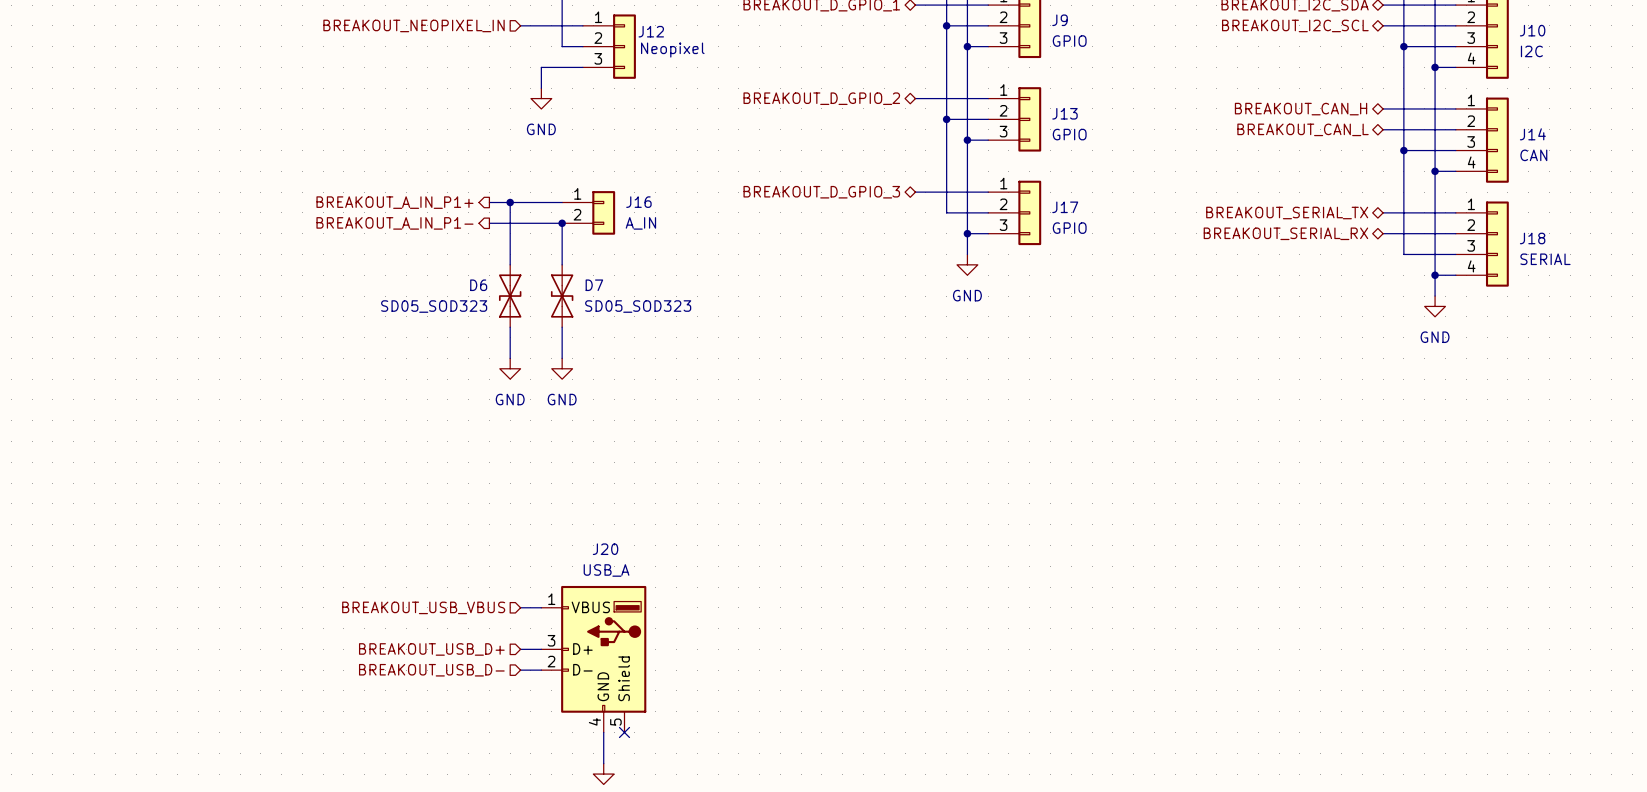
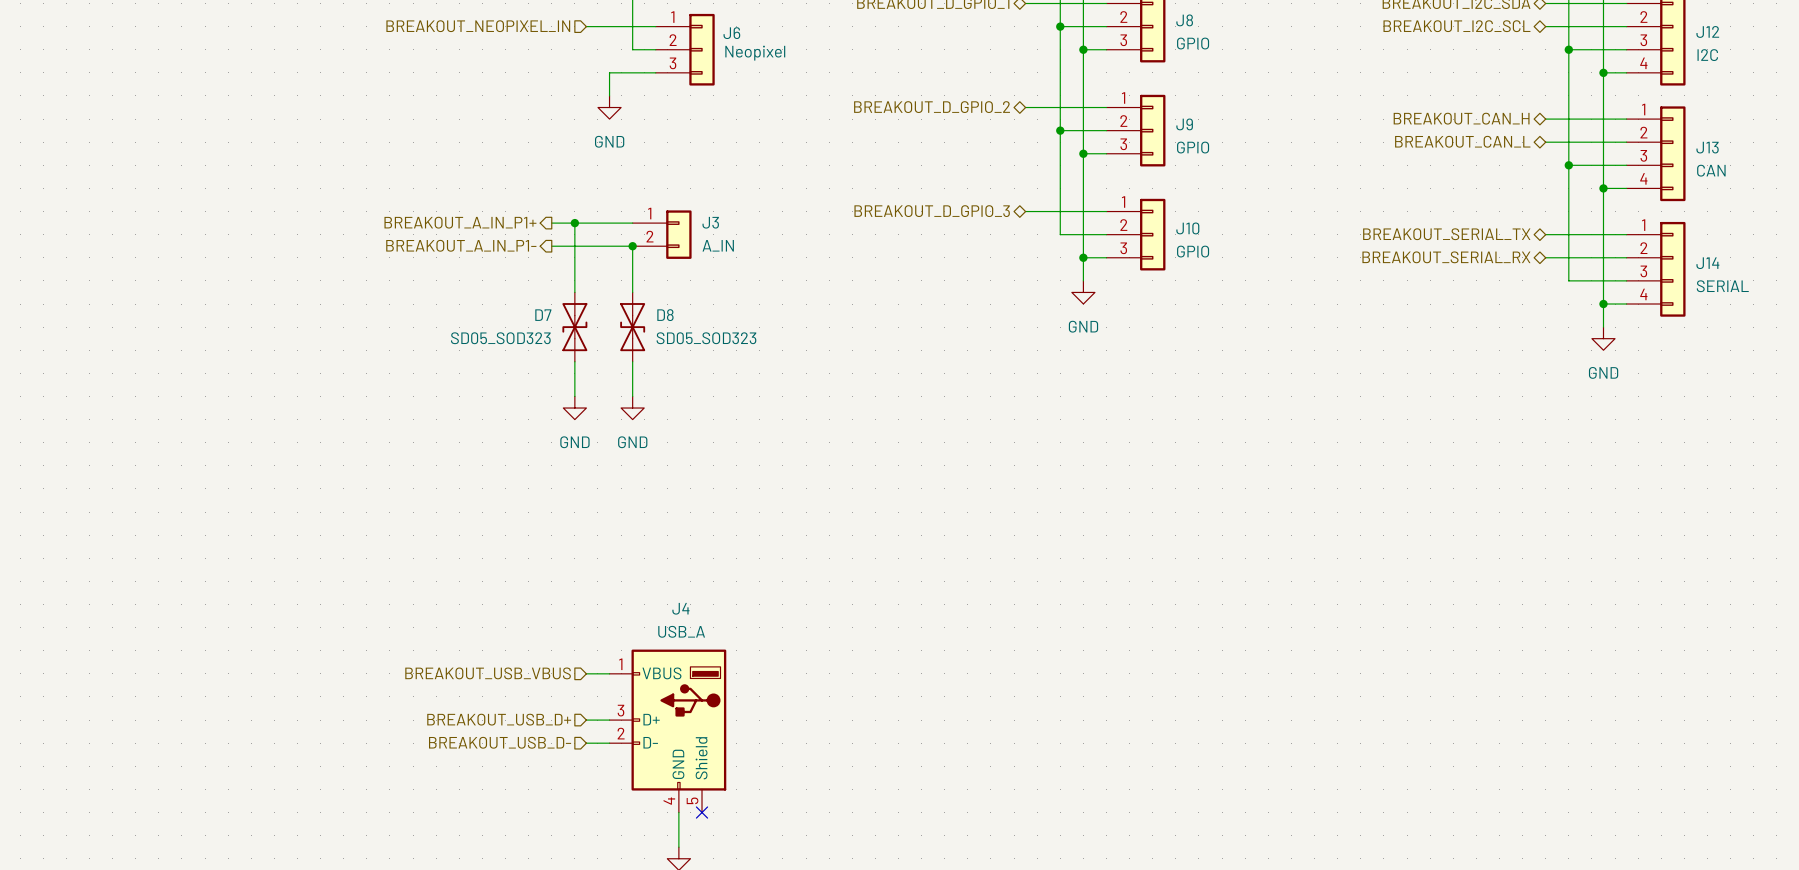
J9 name: J9 (1060, 20) -> J8 (1184, 20)
J10 name: J10 (1532, 30) -> J12 (1707, 31)
J12 name: J12 (651, 31) -> J6 (731, 33)
J13 name: J13 (1064, 113) -> J9 (1184, 124)
J14 name: J14 (1532, 134) -> J13 (1707, 147)
J16 name: J16 (638, 202) -> J3 (710, 222)
J17 name: J17 (1065, 207) -> J10 (1187, 228)
J18 name: J18 (1532, 238) -> J14 (1707, 263)
D6 name: D6 (478, 285) -> D7 (543, 315)
D7 name: D7 (594, 285) -> D8 (665, 315)
J20 name: J20 (605, 549) -> J4 (680, 608)

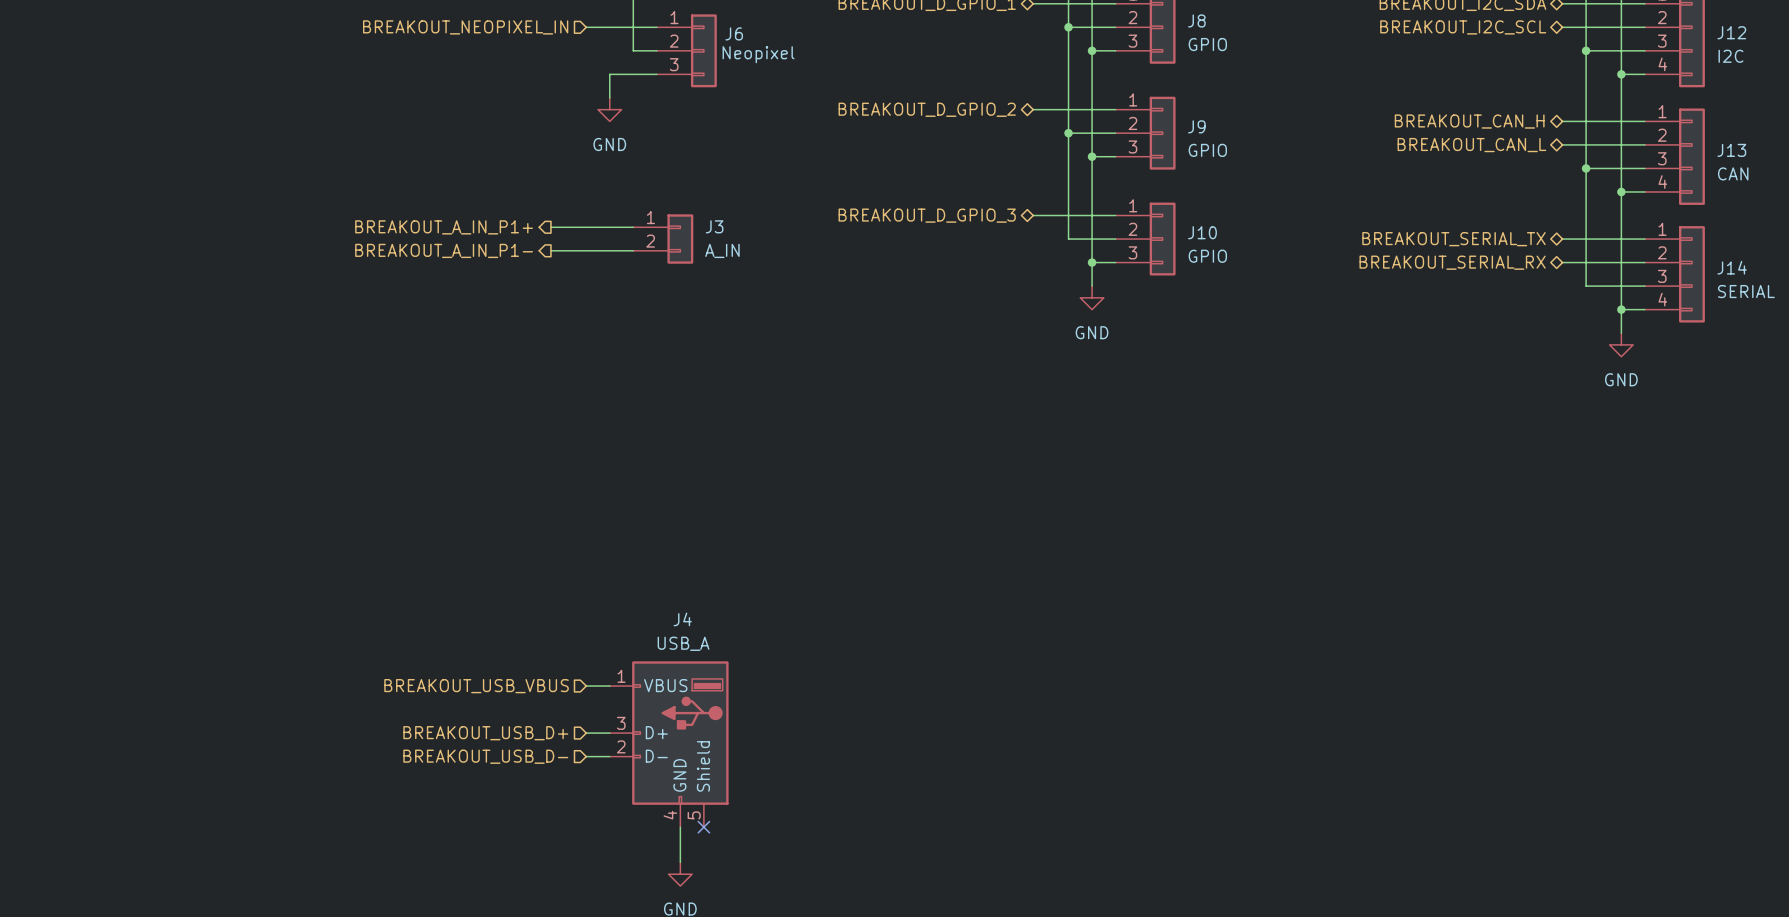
wire: (574, 223) (574, 292) -> none
junction: (574, 223) -> none
wire: (632, 246) (632, 292) -> none
junction: (632, 246) -> none
D7: SD05_SOD323 (574, 327) -> none
D8: SD05_SOD323 (632, 327) -> none
wire: (574, 361) (574, 396) -> none
wire: (632, 361) (632, 396) -> none
power symbol: GND (574, 408) -> none
power symbol: GND (632, 408) -> none

